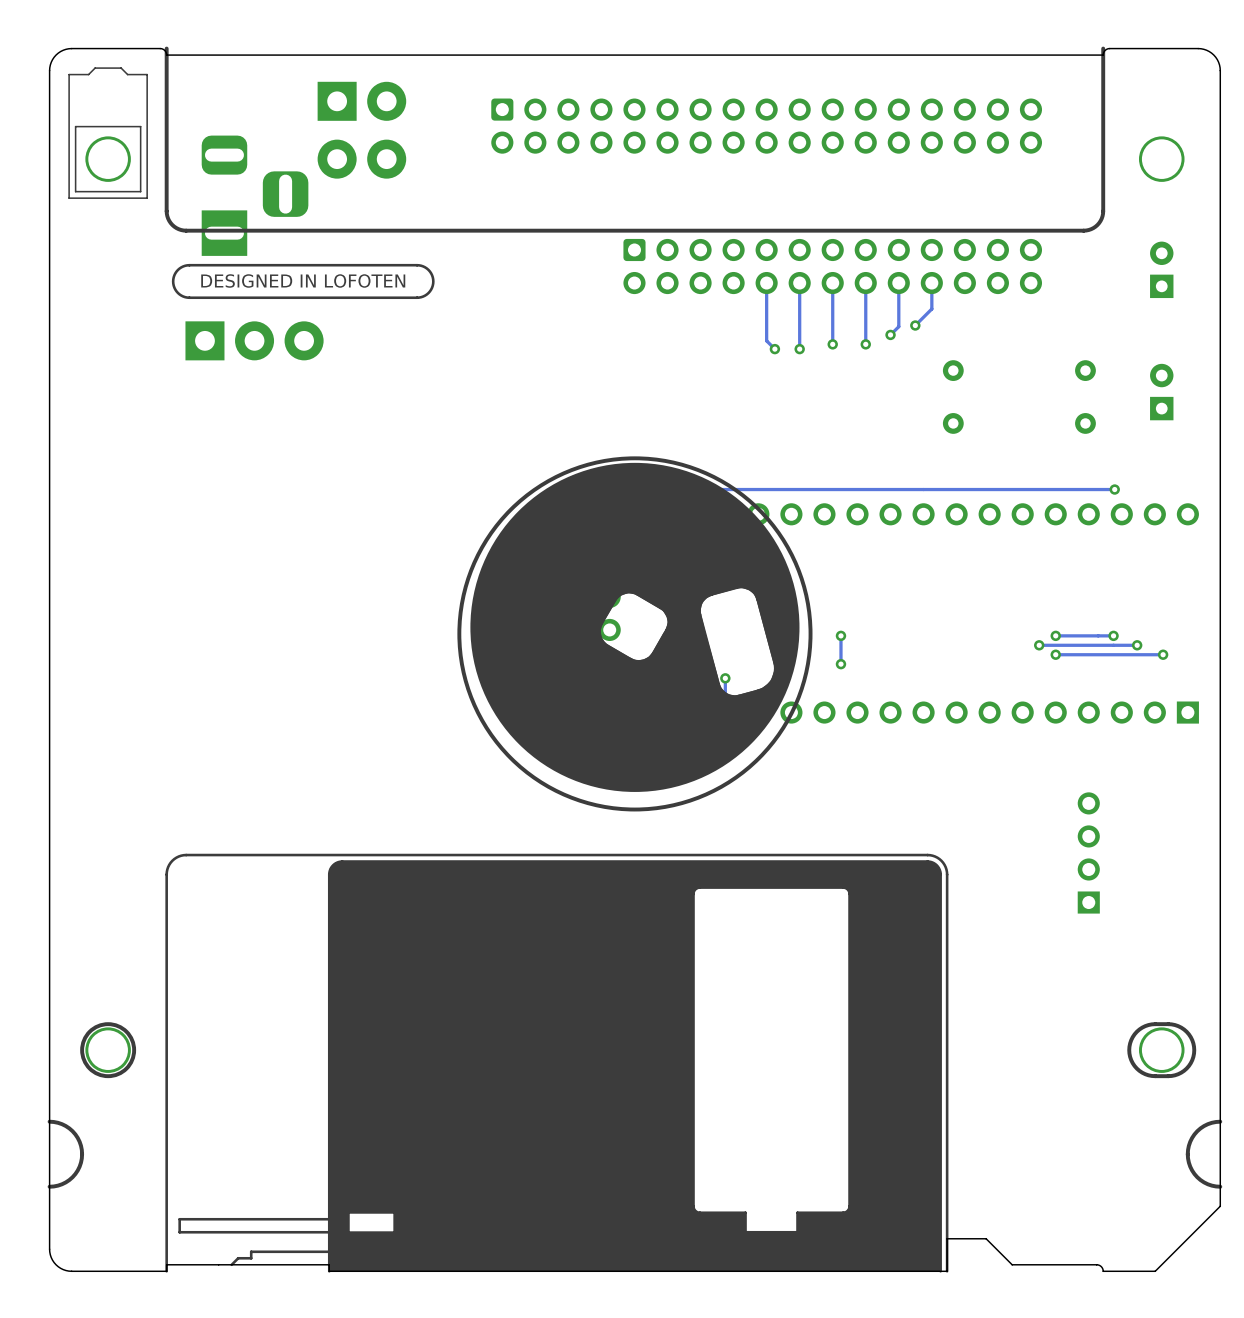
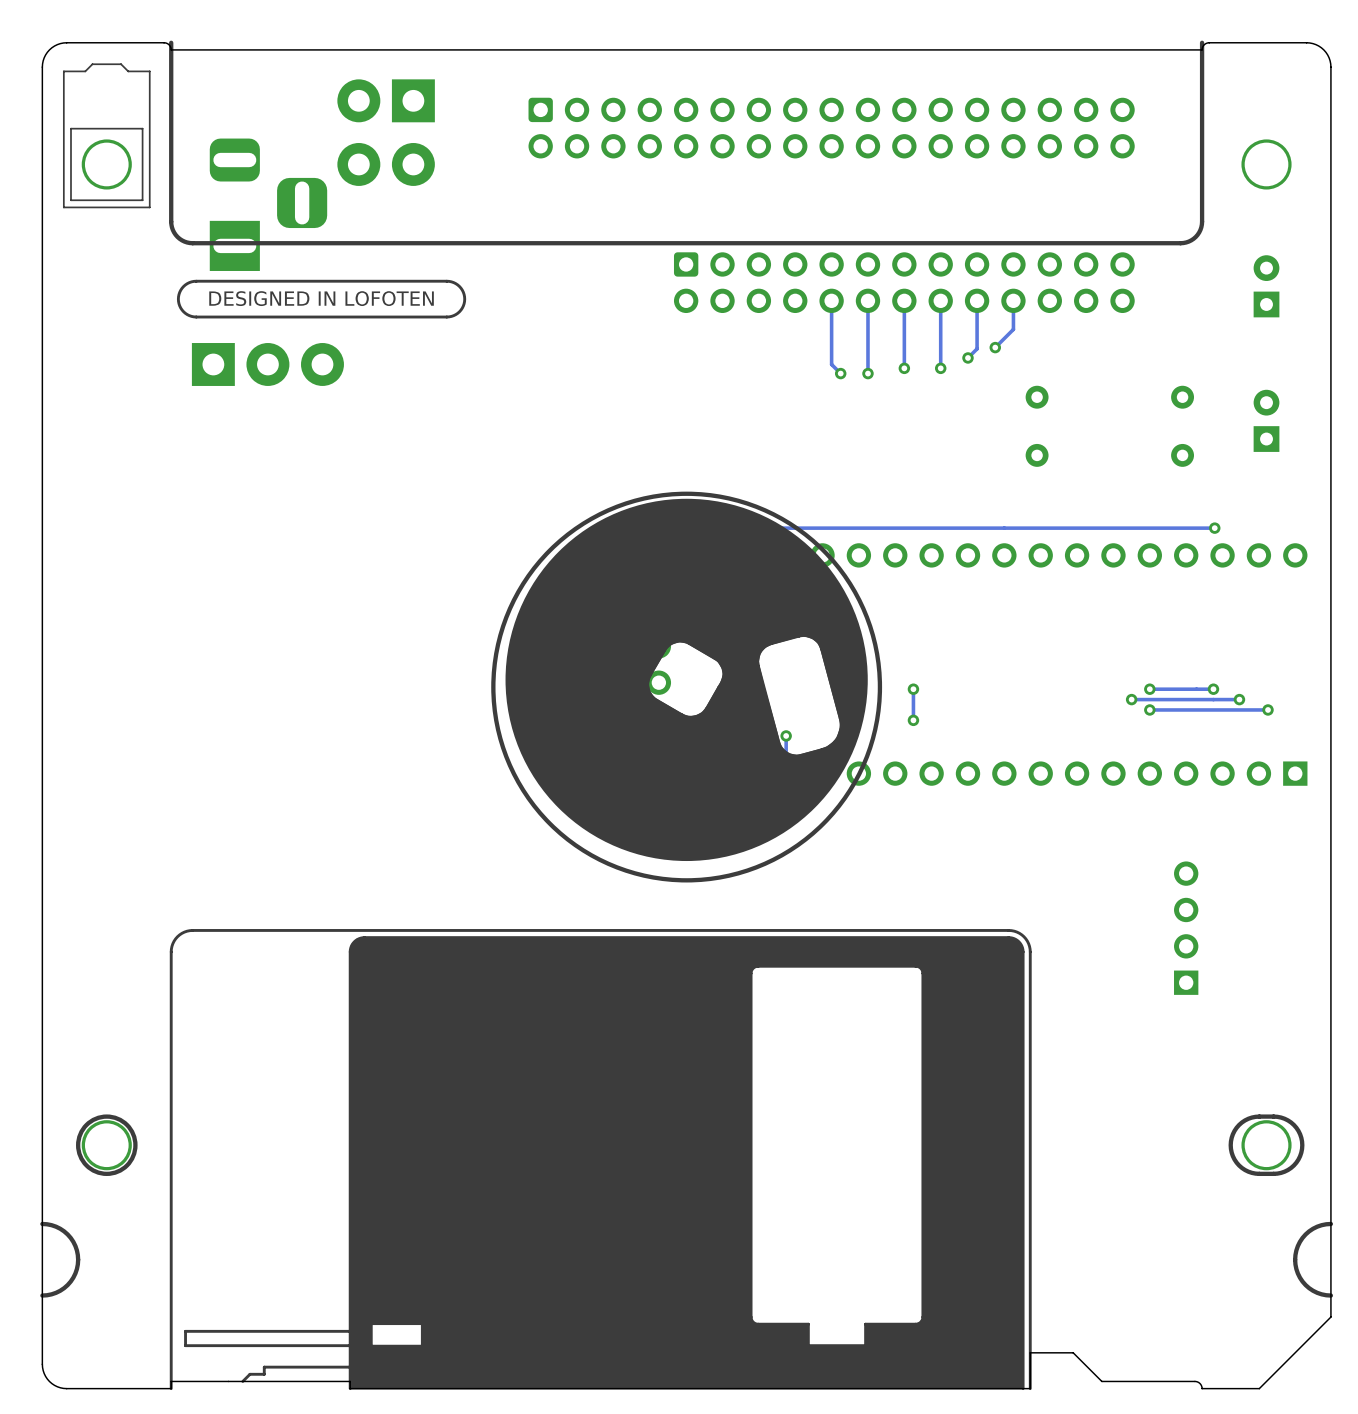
part footprint: [317, 81, 407, 179] -> [337, 79, 435, 186]

